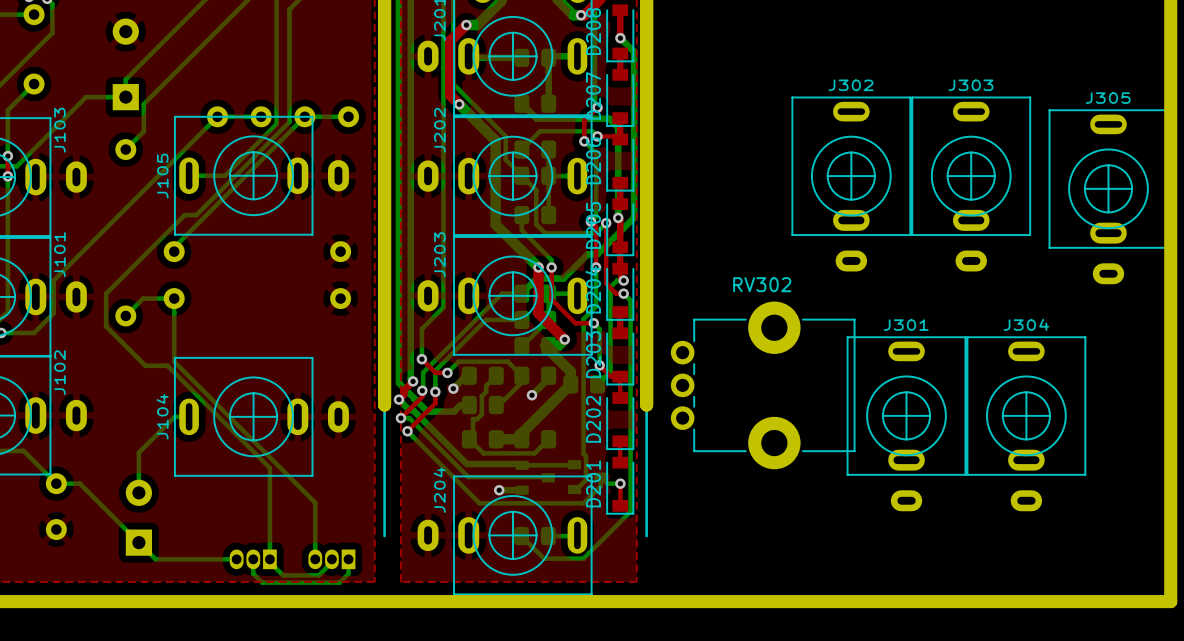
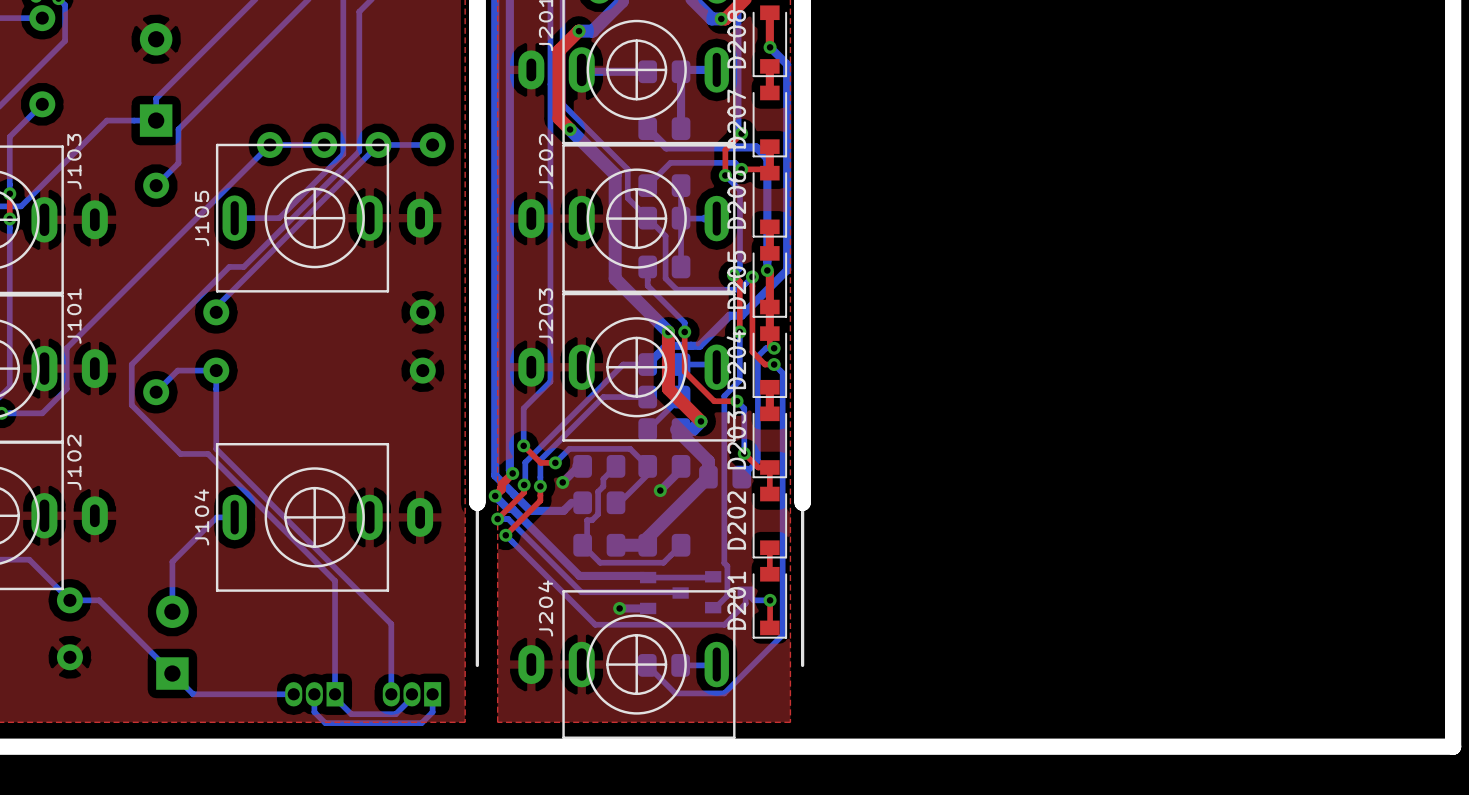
J302: (851, 183) -> none
J303: (971, 183) -> none
J305: (1108, 196) -> none
RV302: (763, 385) -> none
J301: (906, 423) -> none
J304: (1026, 423) -> none

